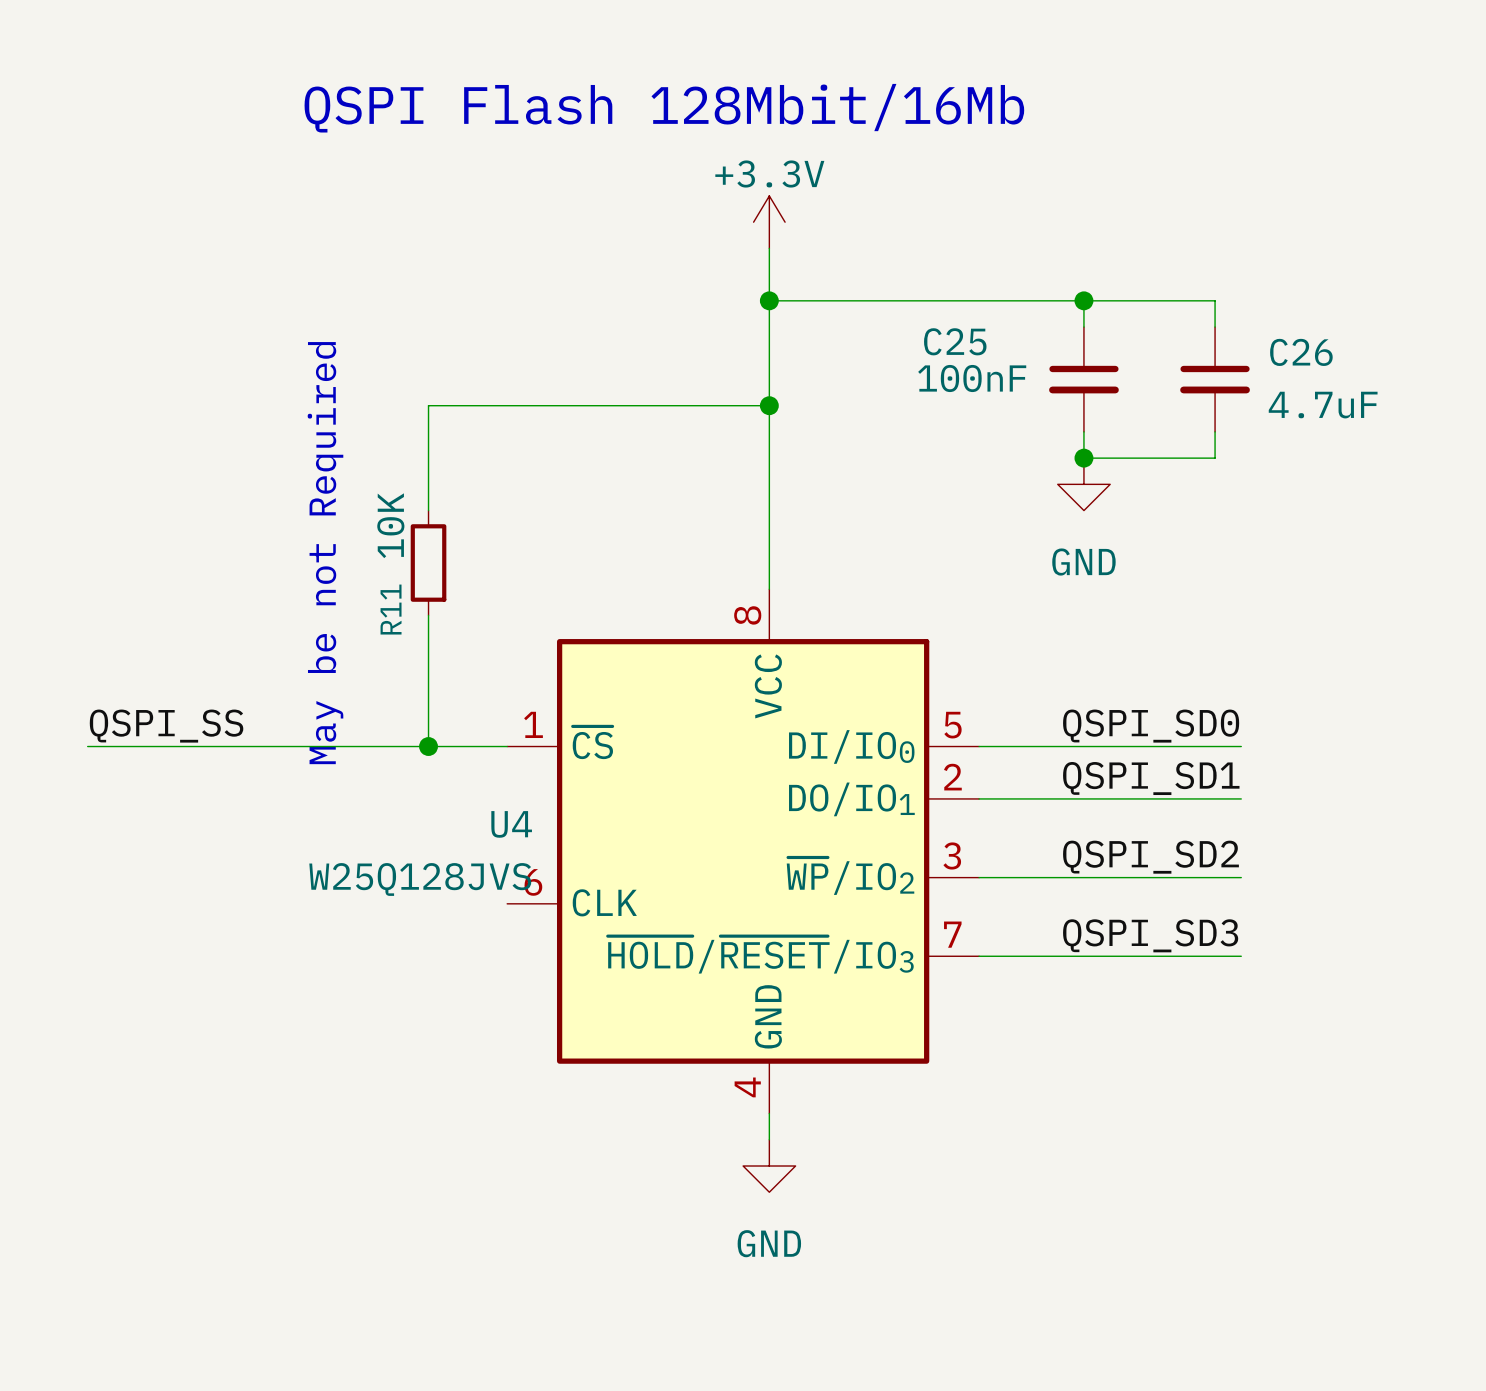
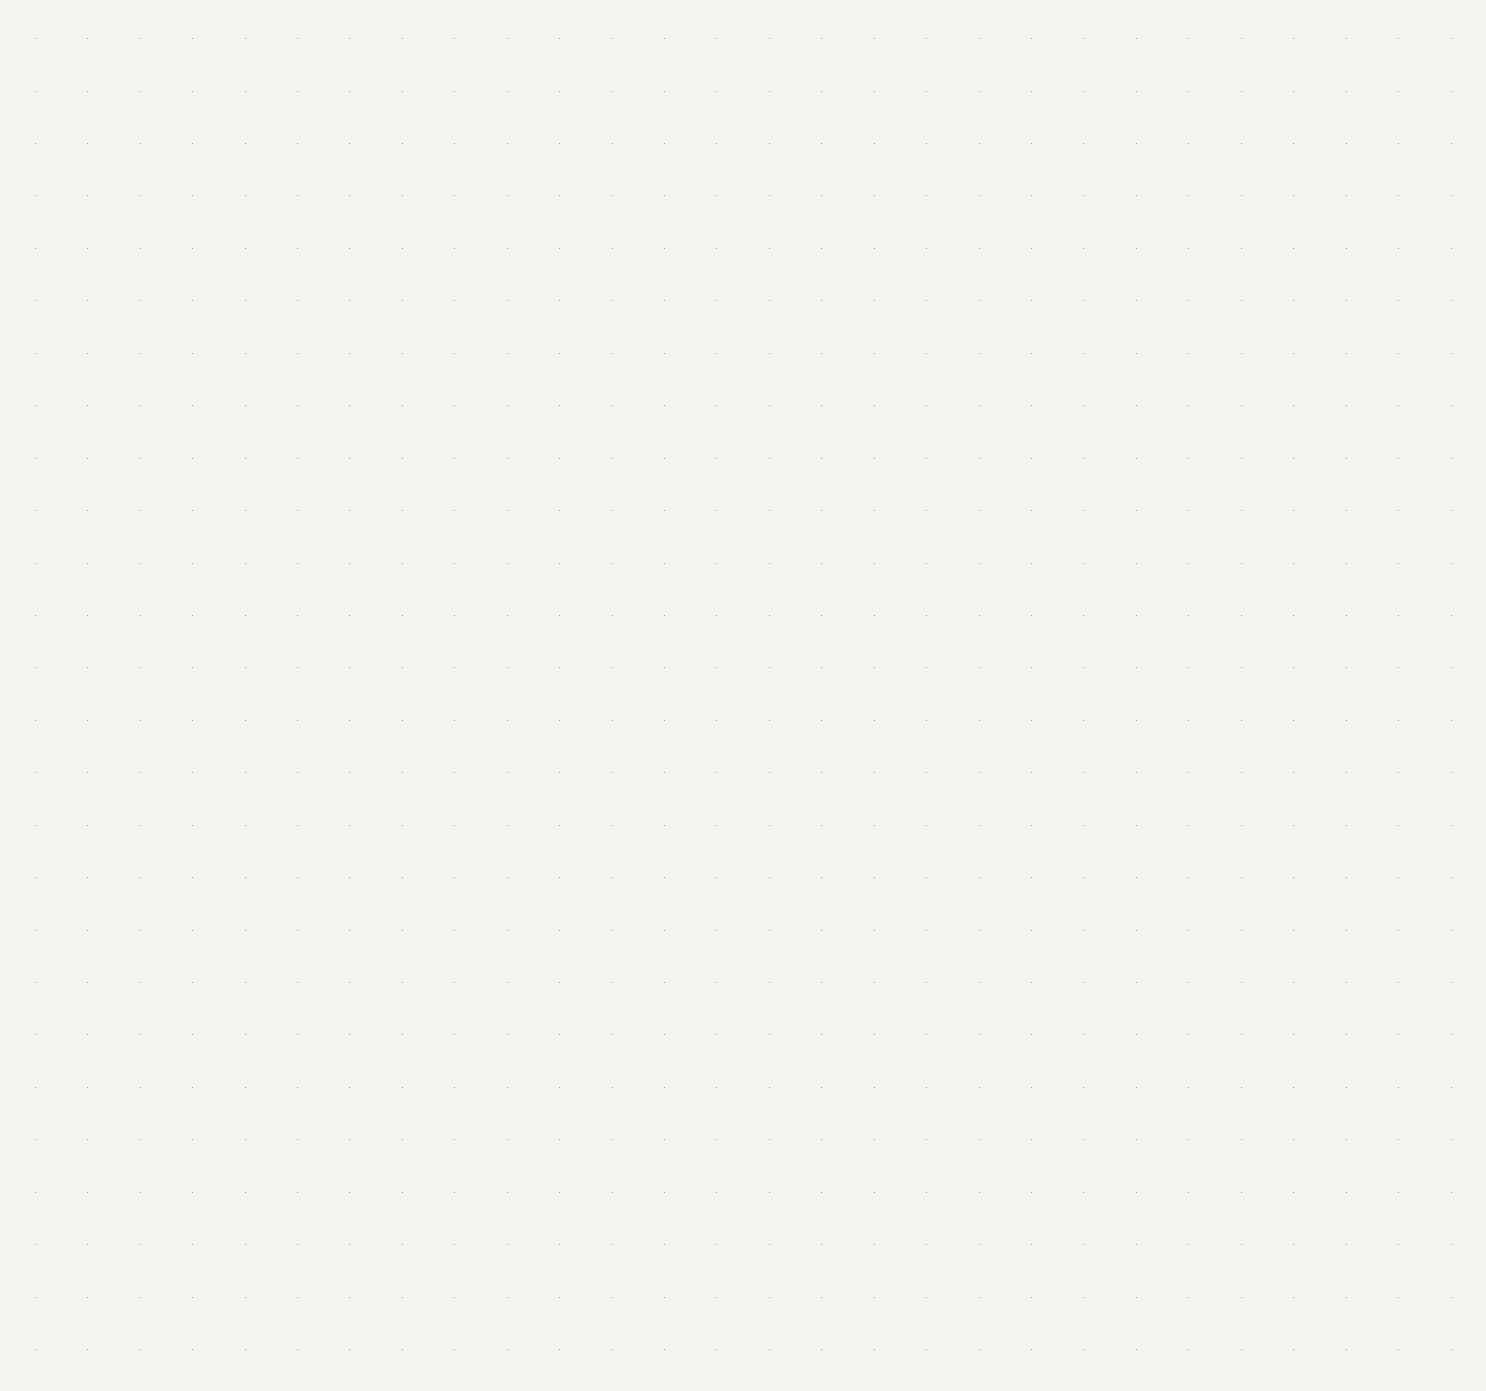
text: QSPI Flash 128Mbit/16Mb (664, 108) -> none
power symbol: +3.3V (769, 222) -> none
wire: (769, 248) (769, 589) -> none
wire: (769, 300) (1215, 300) (1215, 327) -> none
junction: (769, 300) -> none
wire: (1083, 300) (1083, 327) -> none
junction: (1083, 300) -> none
C25: 100nF (1083, 379) -> none
C26: 4.7uF (1215, 379) -> none
wire: (769, 405) (428, 405) (428, 510) -> none
junction: (769, 405) -> none
wire: (1083, 431) (1083, 458) (1215, 458) (1215, 431) -> none
junction: (1083, 458) -> none
power symbol: GND (1083, 484) -> none
text: May be not Required (325, 553) -> none
R11: 10K (428, 563) -> none
wire: (428, 615) (428, 746) -> none
label: QSPI_SS (166, 726) -> none
label: QSPI_SD0 (1151, 726) -> none
wire: (87, 746) (507, 746) -> none
junction: (428, 746) -> none
wire: (979, 746) (1241, 746) -> none
label: QSPI_SD1 (1151, 778) -> none
wire: (979, 798) (1241, 798) -> none
U4: W25Q128JVS (743, 851) -> none
label: QSPI_SD2 (1150, 857) -> none
wire: (979, 877) (1241, 877) -> none
label: QSPI_SD3 (1150, 935) -> none
wire: (979, 956) (1241, 956) -> none
wire: (769, 1113) (769, 1139) -> none
power symbol: GND (769, 1166) -> none

